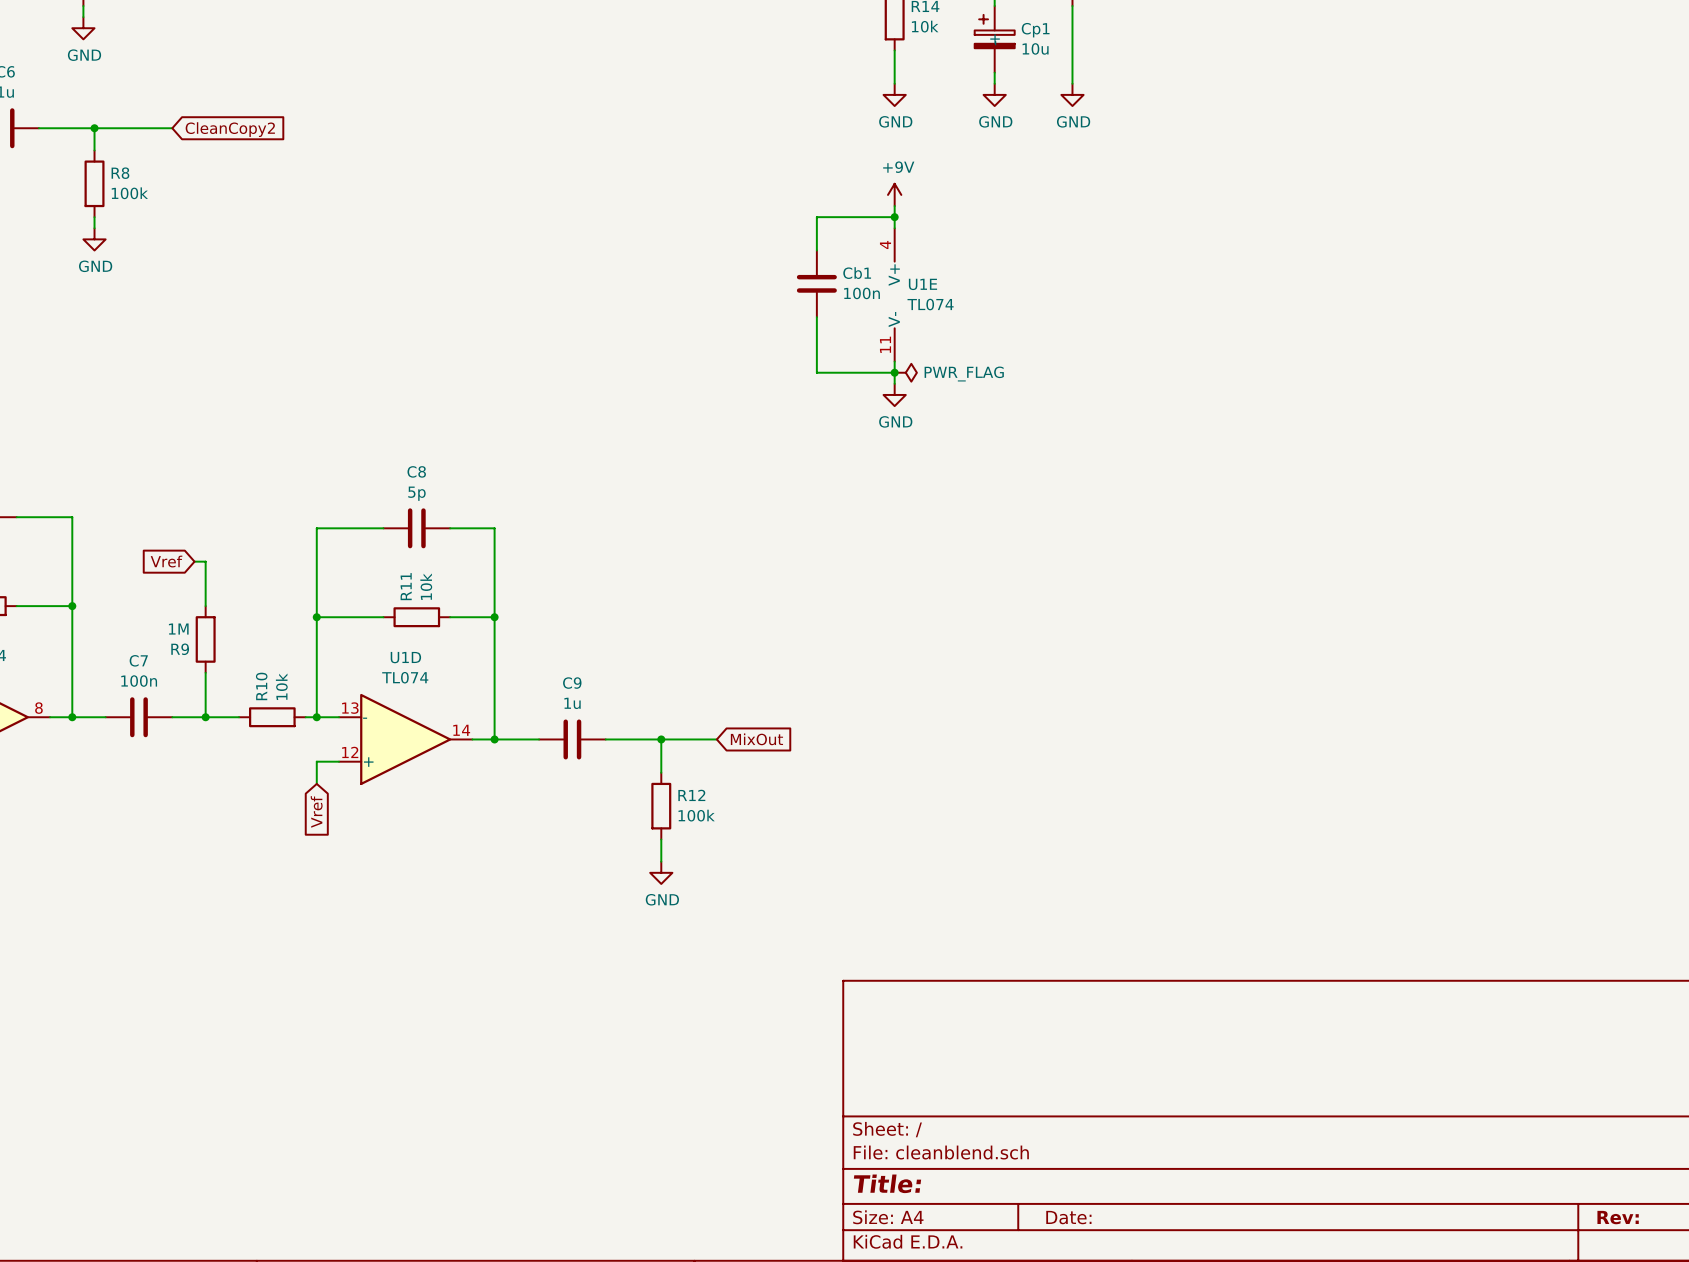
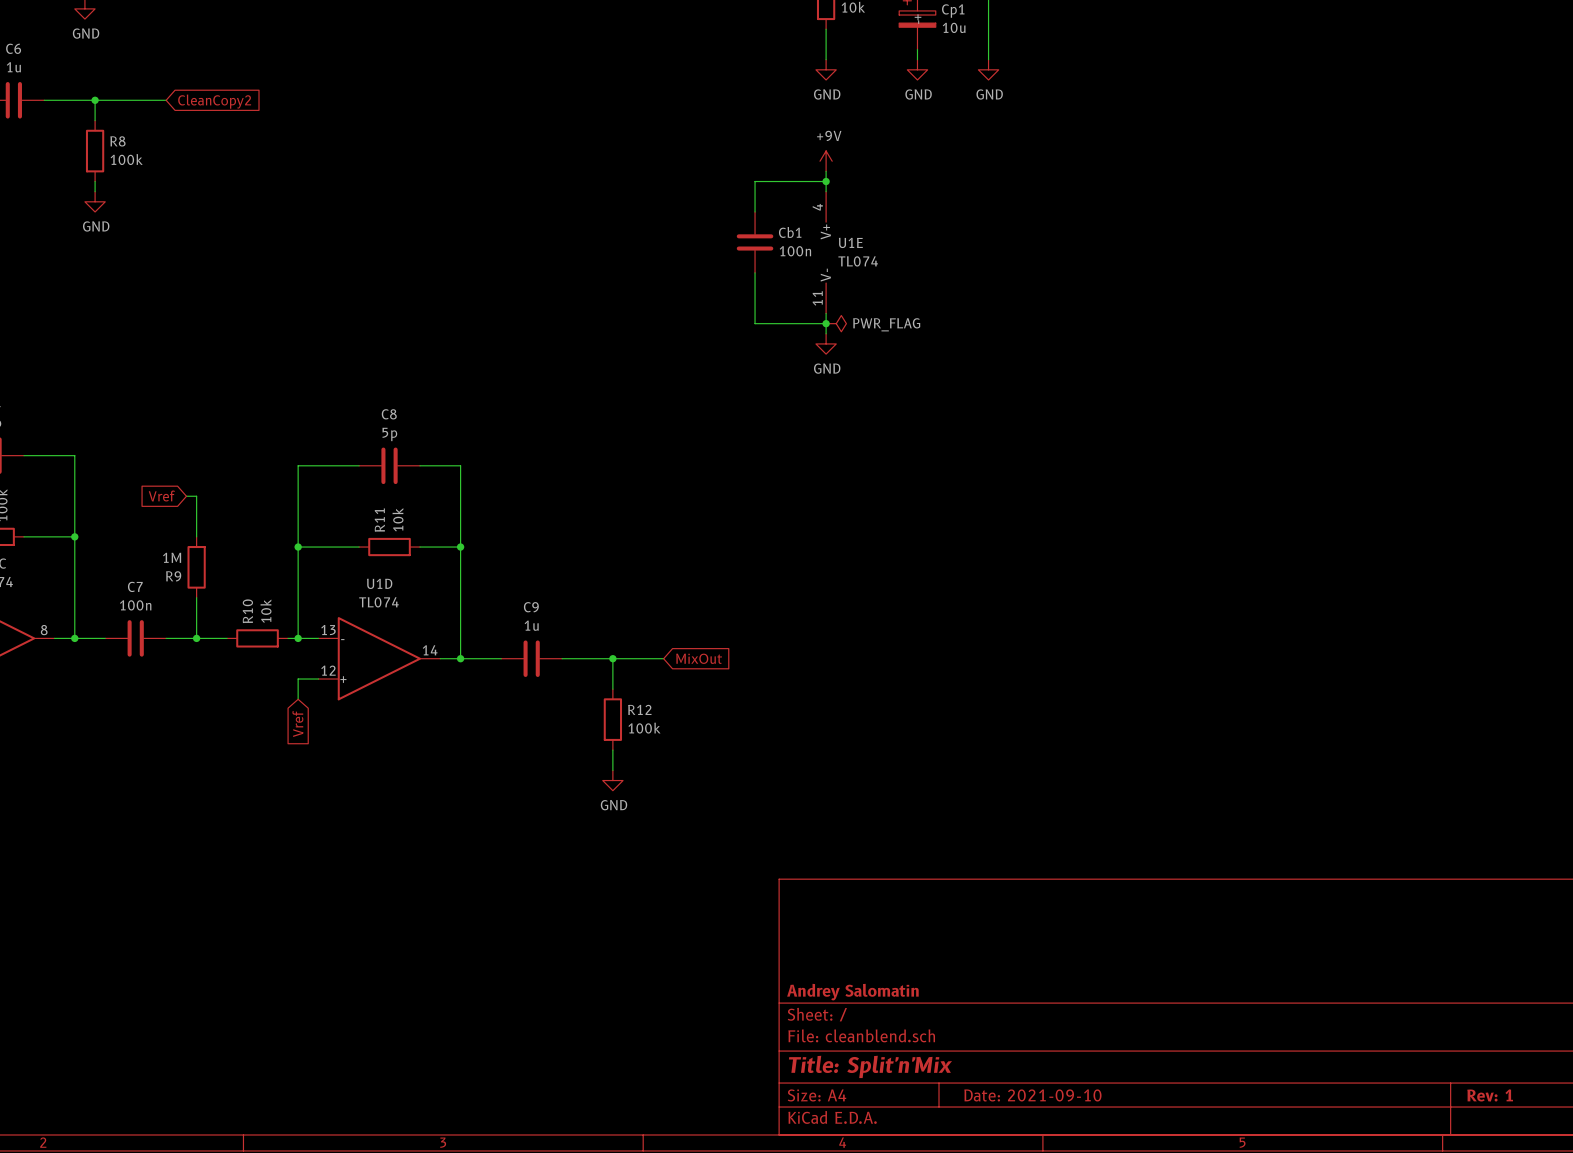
title block: none -> Andrey Salomatin (852, 992)
title block: Title: (887, 1183) -> Title: Split'n'Mix (870, 1066)
title block: Date: (1068, 1217) -> Date: 2021-09-10 (1032, 1095)
title block: Rev: (1618, 1217) -> Rev: 1 (1490, 1095)

